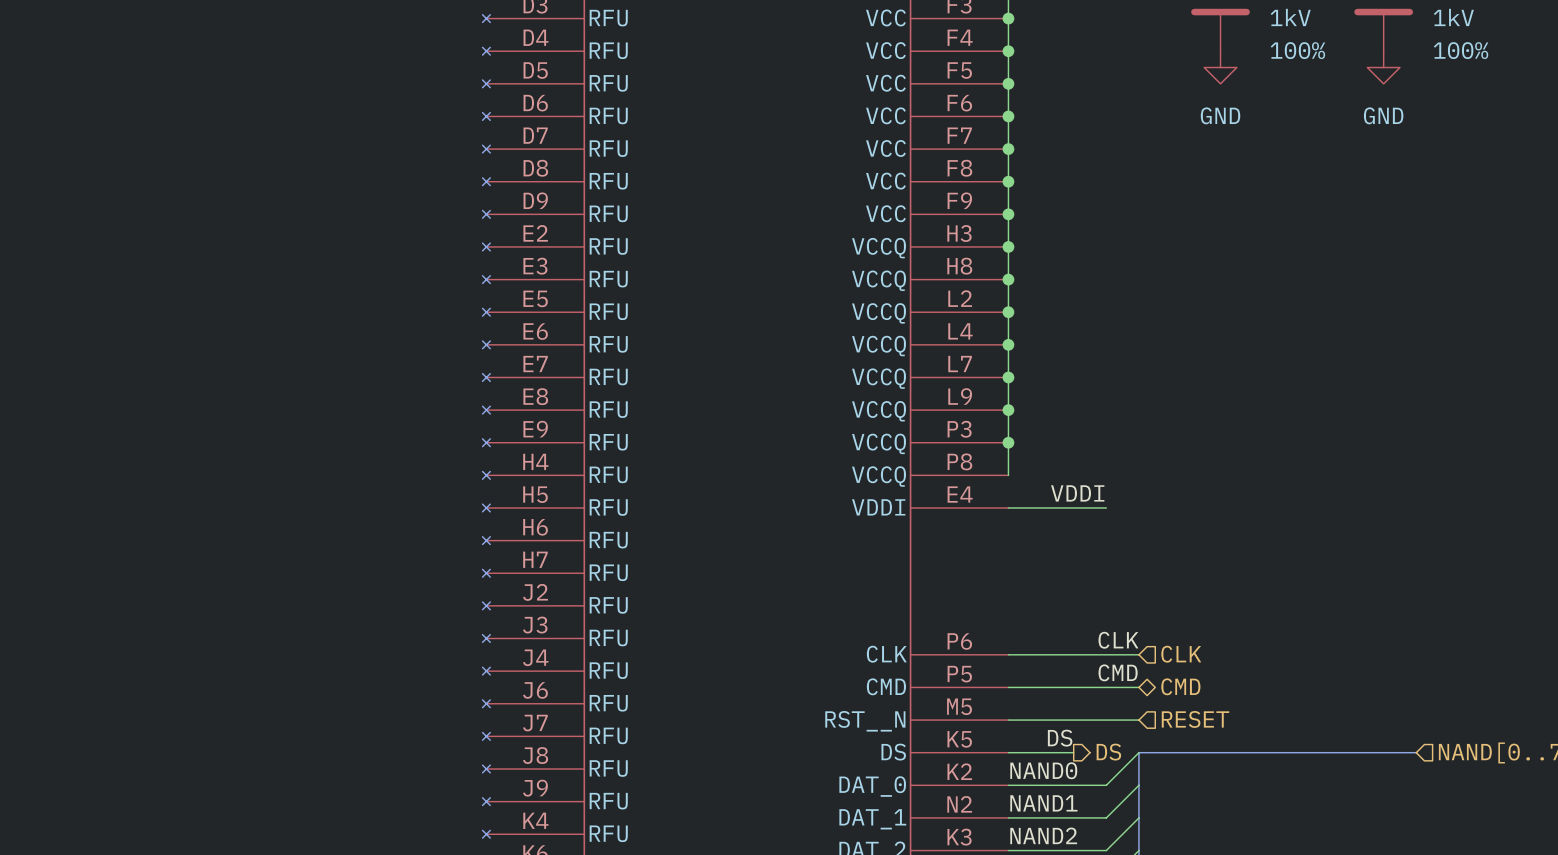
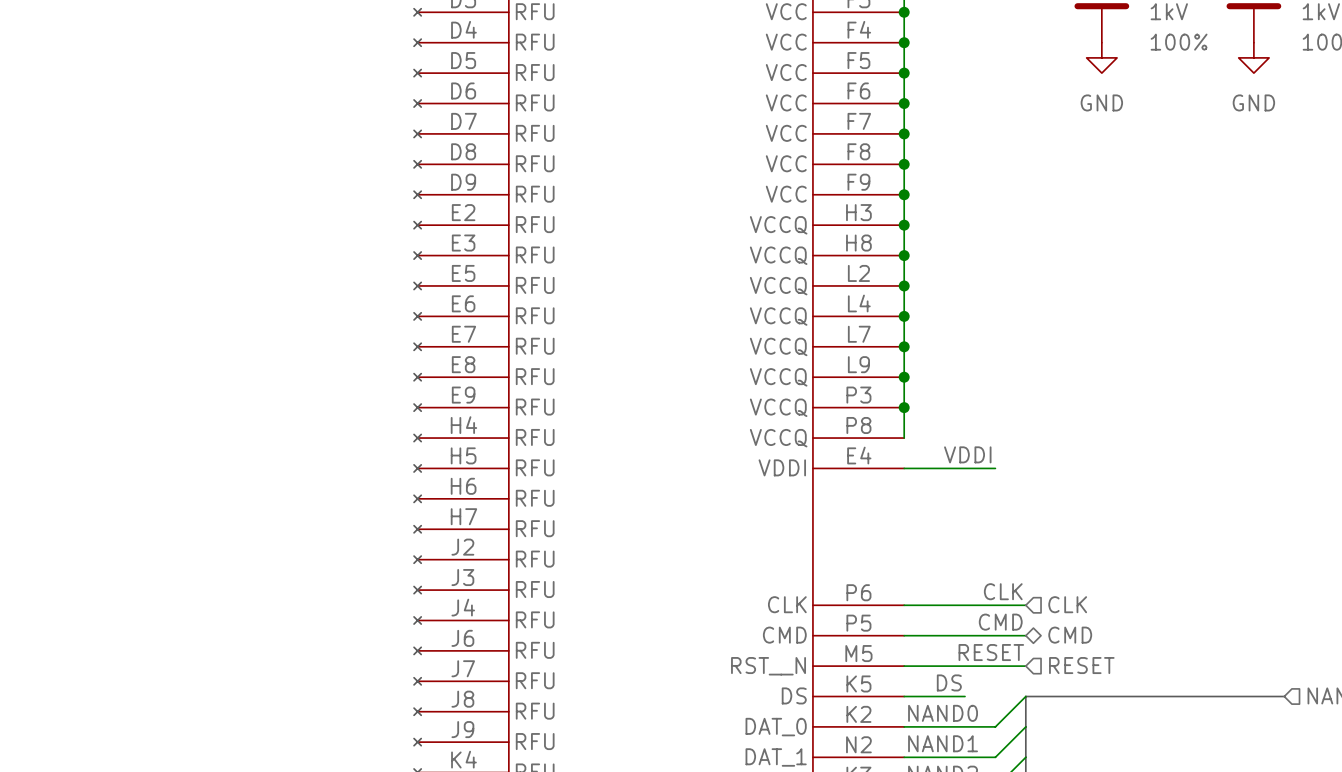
label: none -> RESET (991, 652)
hierarchical label: DS (1108, 752) -> none

